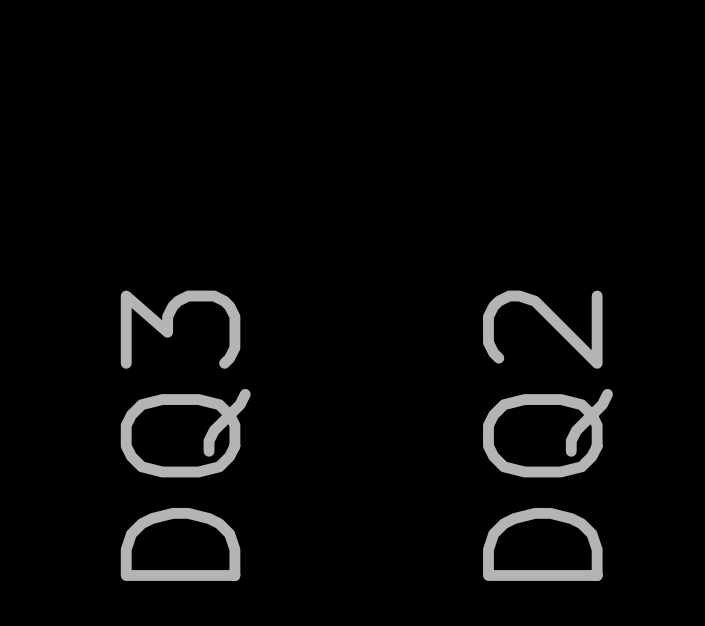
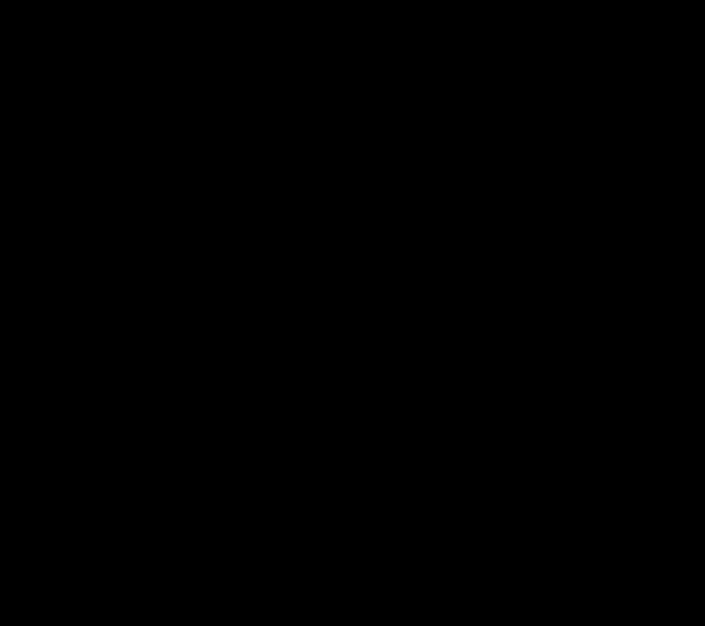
label: DQ3 (185, 435) -> none
label: DQ2 (547, 435) -> none

